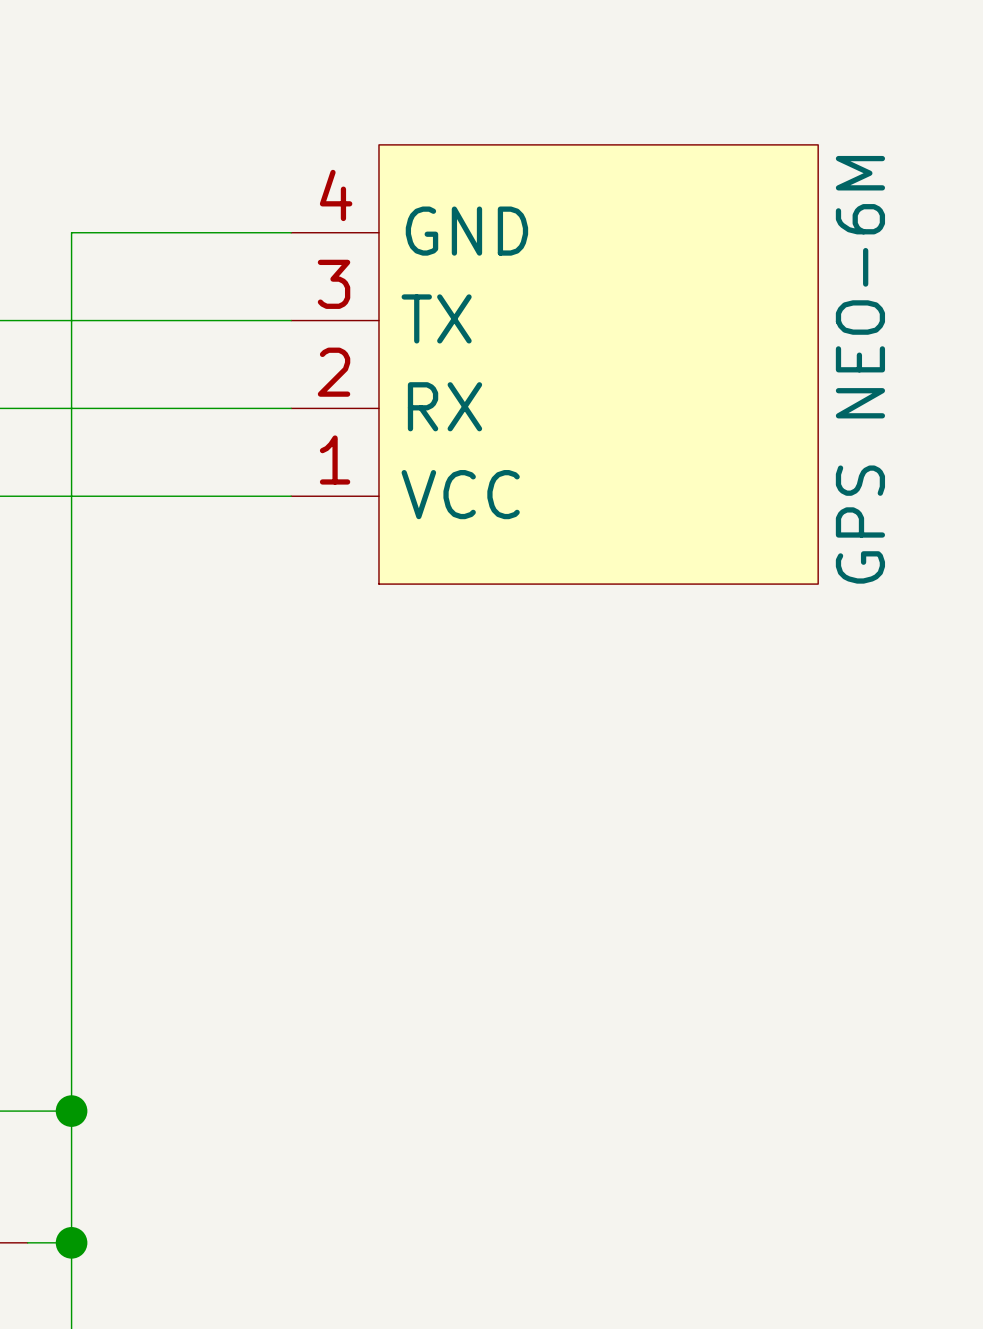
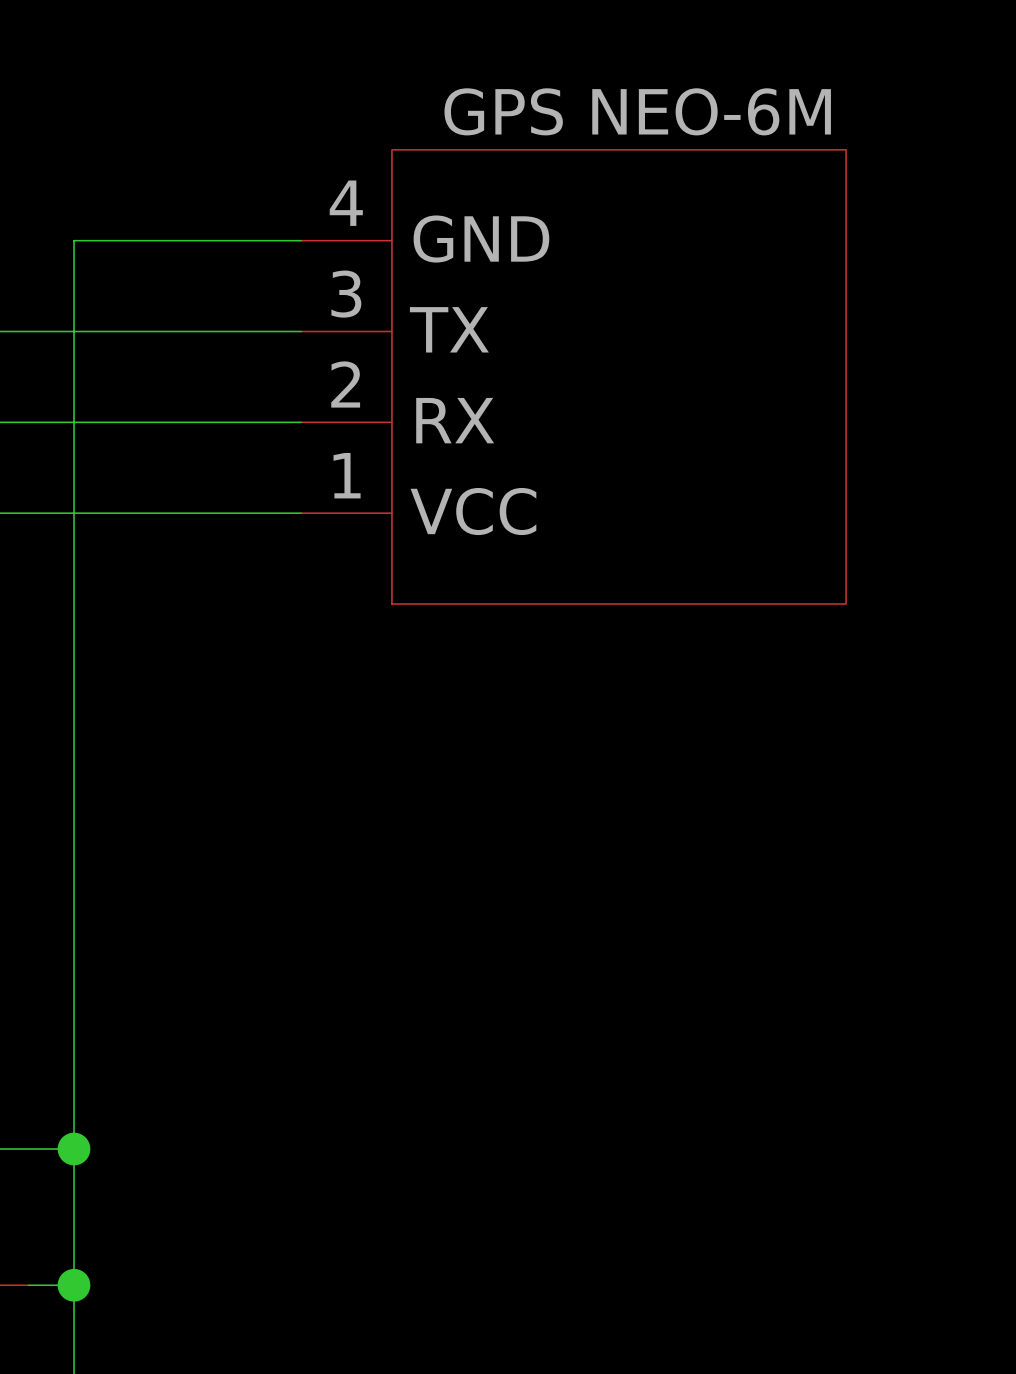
part value rotation: 0° (860, 369) -> 90° clockwise (637, 111)

